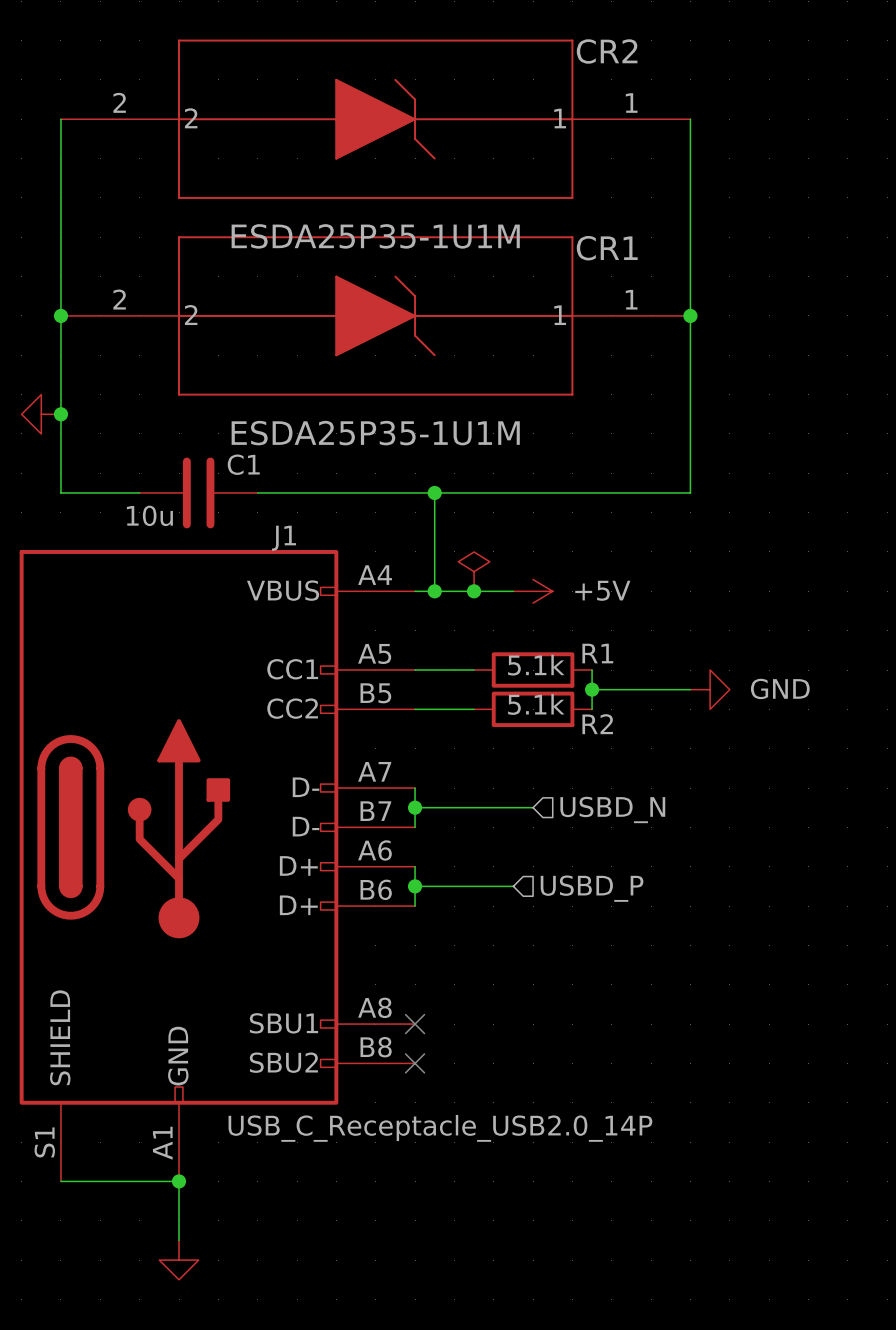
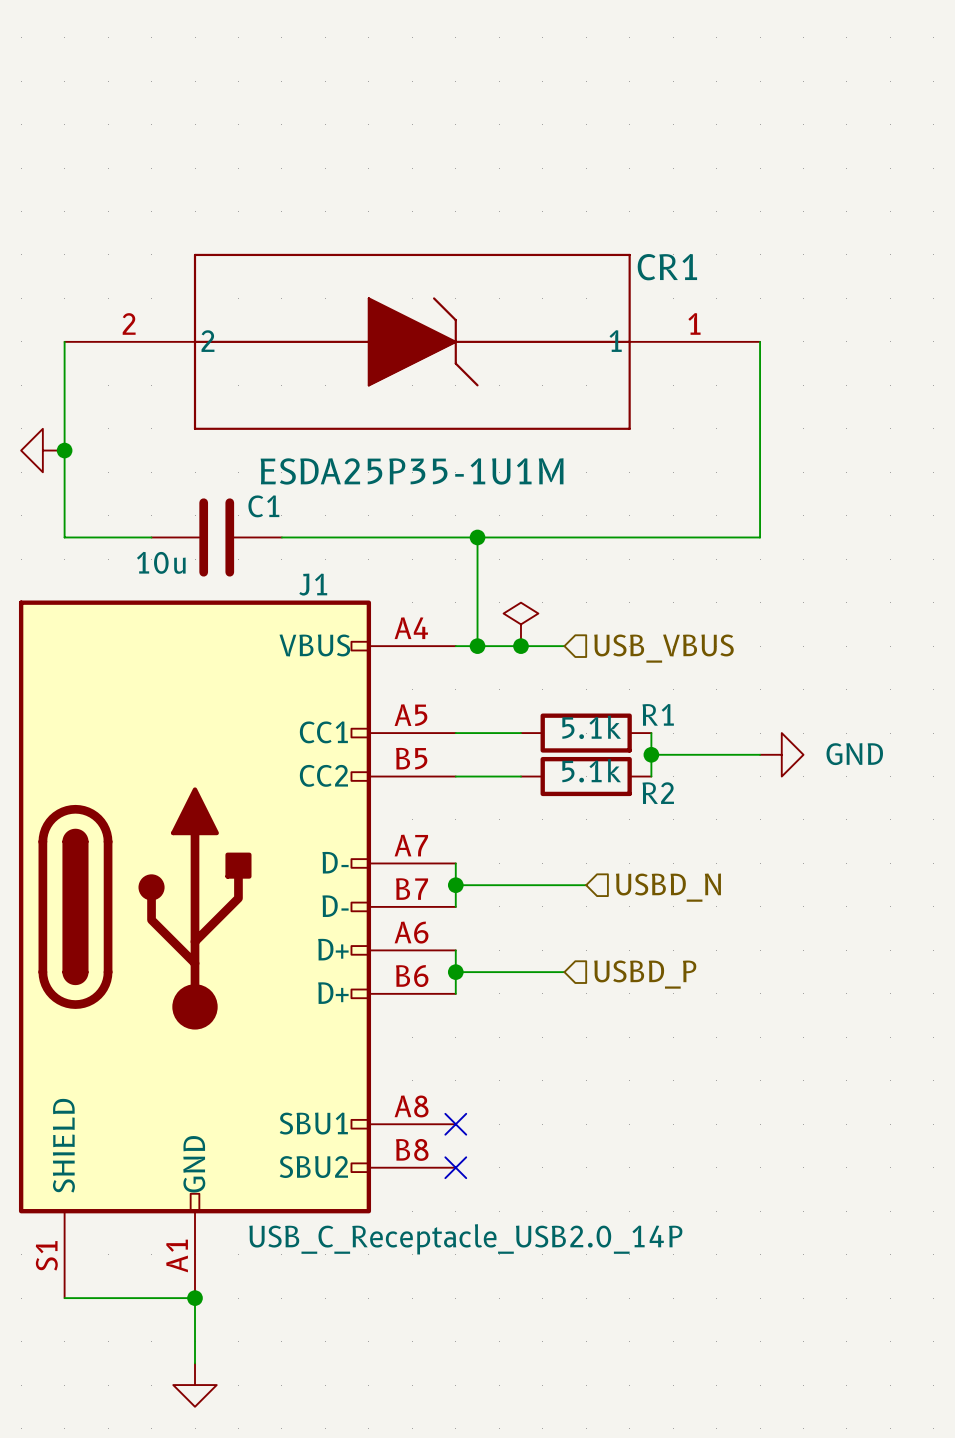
wire: (60, 119) (60, 315) -> none
CR2: ESDA25P35-1U1M (375, 119) -> none
wire: (690, 119) (690, 315) -> none
junction: (60, 315) -> none
junction: (690, 315) -> none
power symbol: +5V (533, 591) -> none
hierarchical label: none -> USB_VBUS (663, 648)

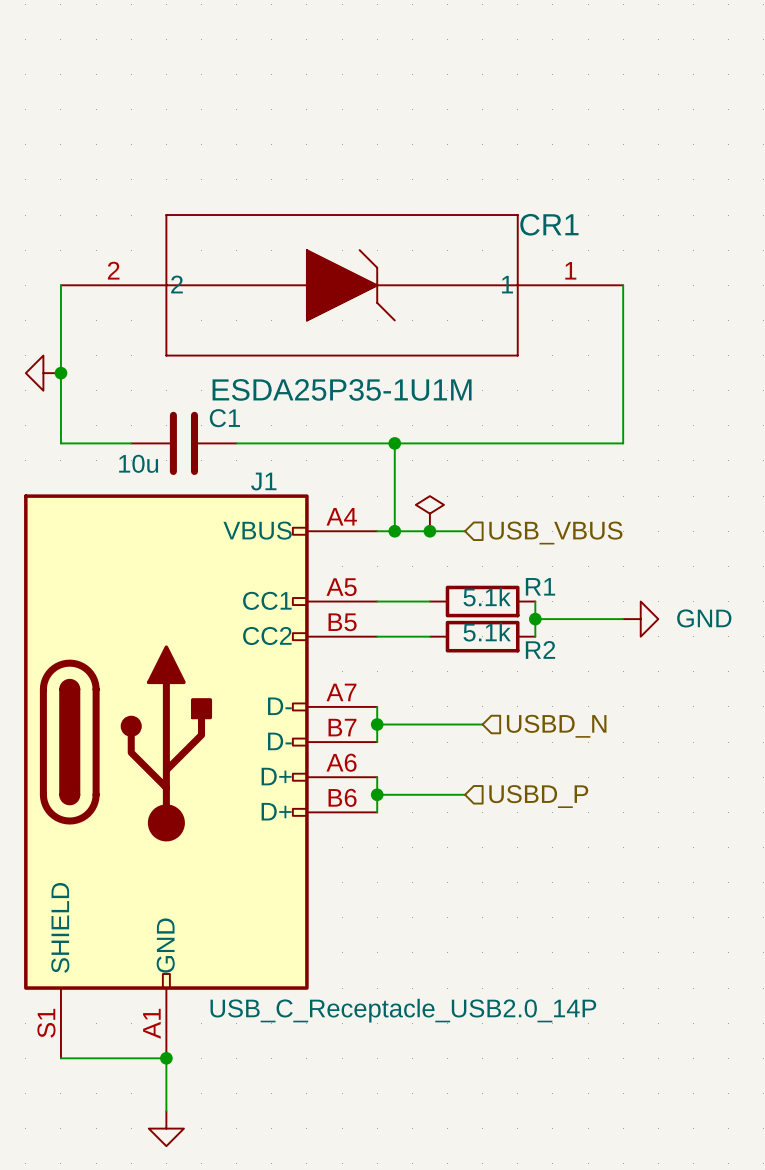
J1 symbol: [18, 600, 456, 1299] -> [24, 494, 378, 1059]
no-connect mark: (455, 1124) -> none
no-connect mark: (455, 1167) -> none

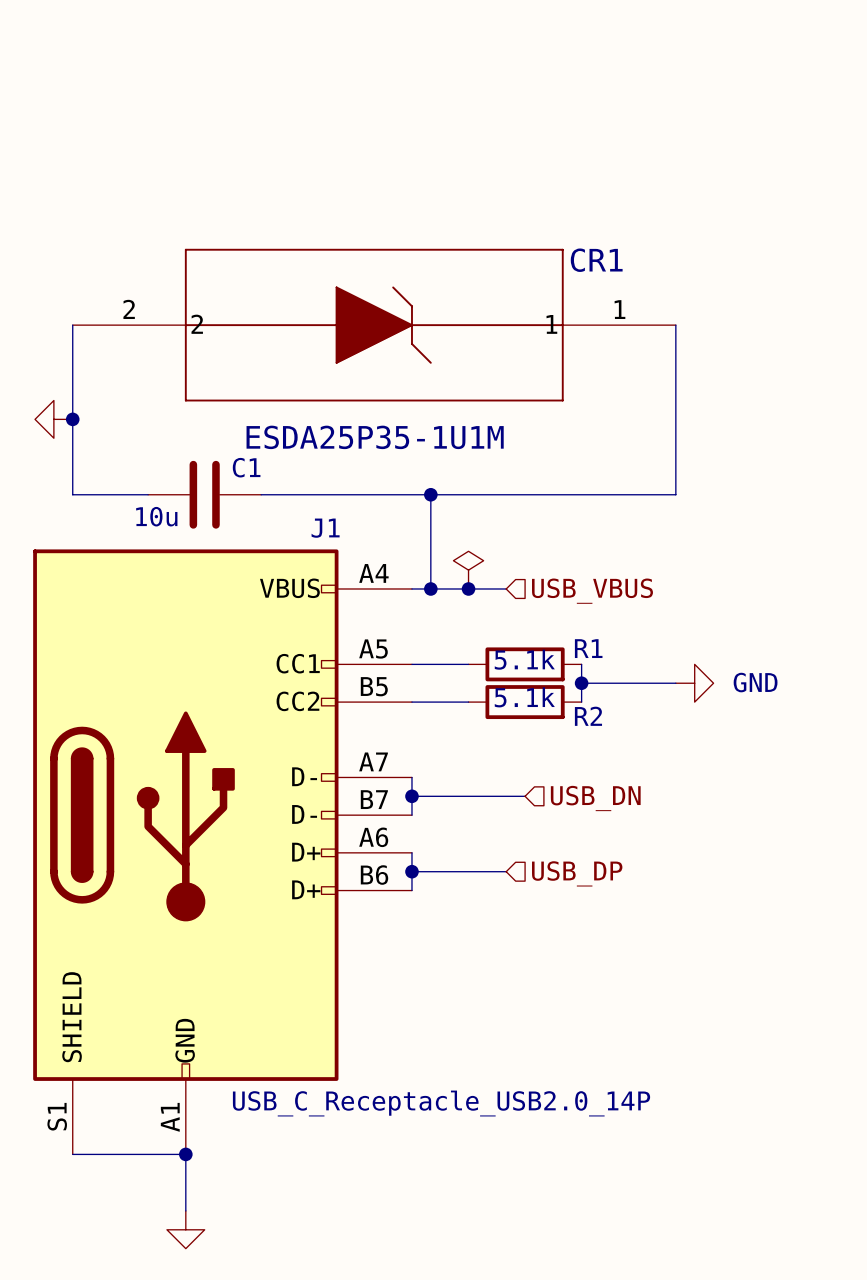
J1 name position: J1 (263, 481) -> J1 (325, 528)
hierarchical label: USBD_N (556, 726) -> USB_DN (595, 798)
hierarchical label: USBD_P (538, 796) -> USB_DP (577, 873)

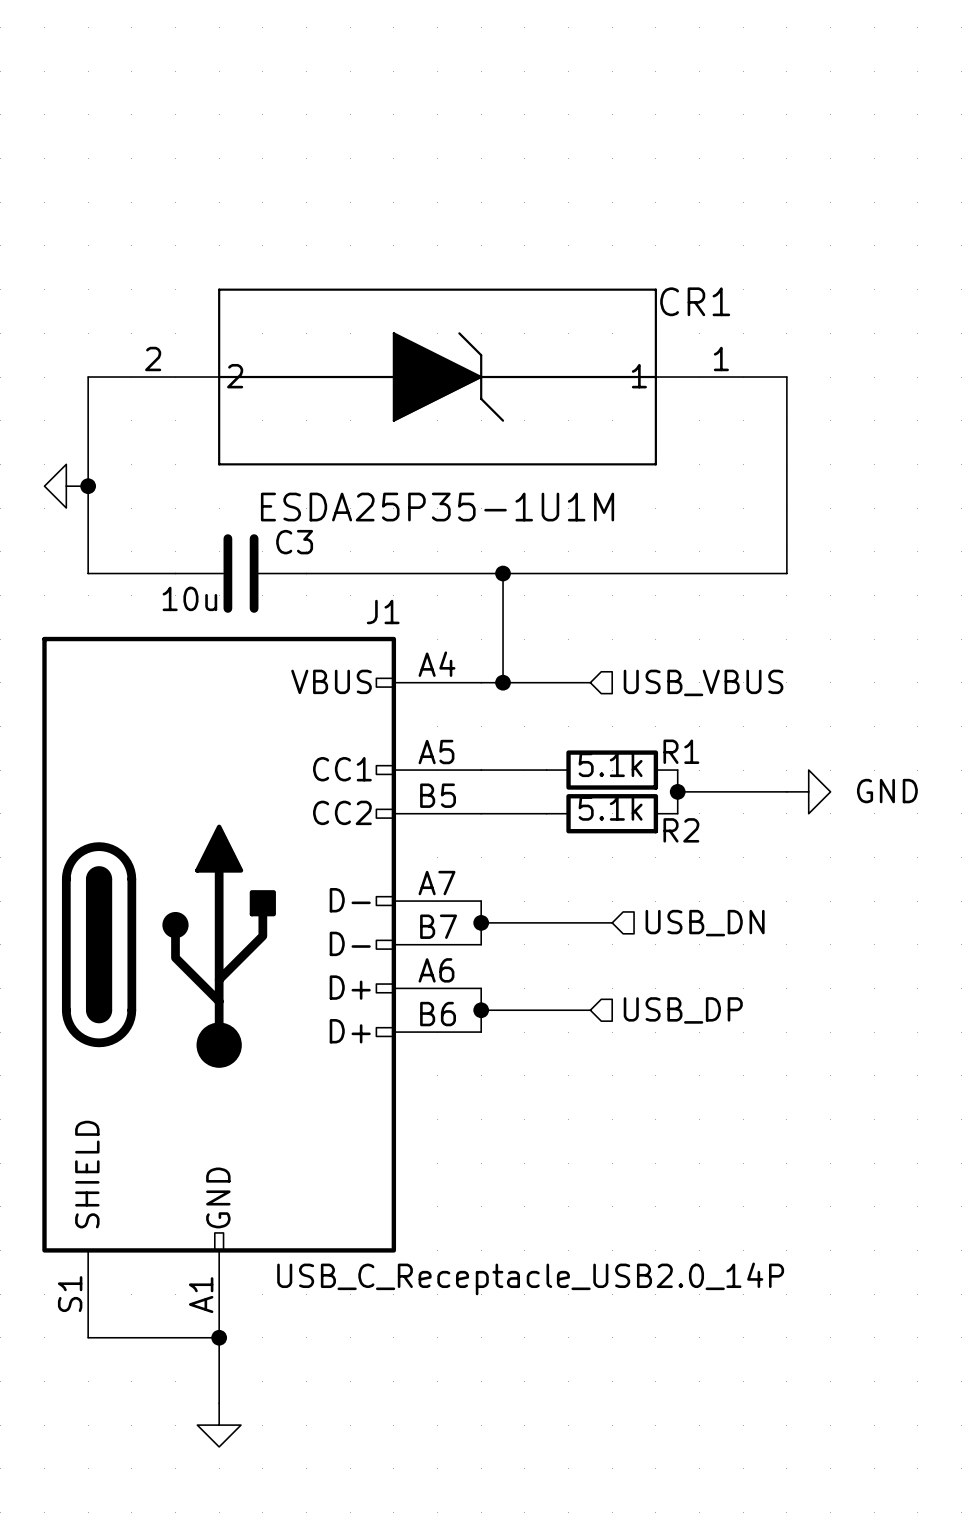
C1 name: C1 (246, 467) -> C3 (294, 542)
power symbol: (468, 570) -> none
junction: (468, 588) -> none

